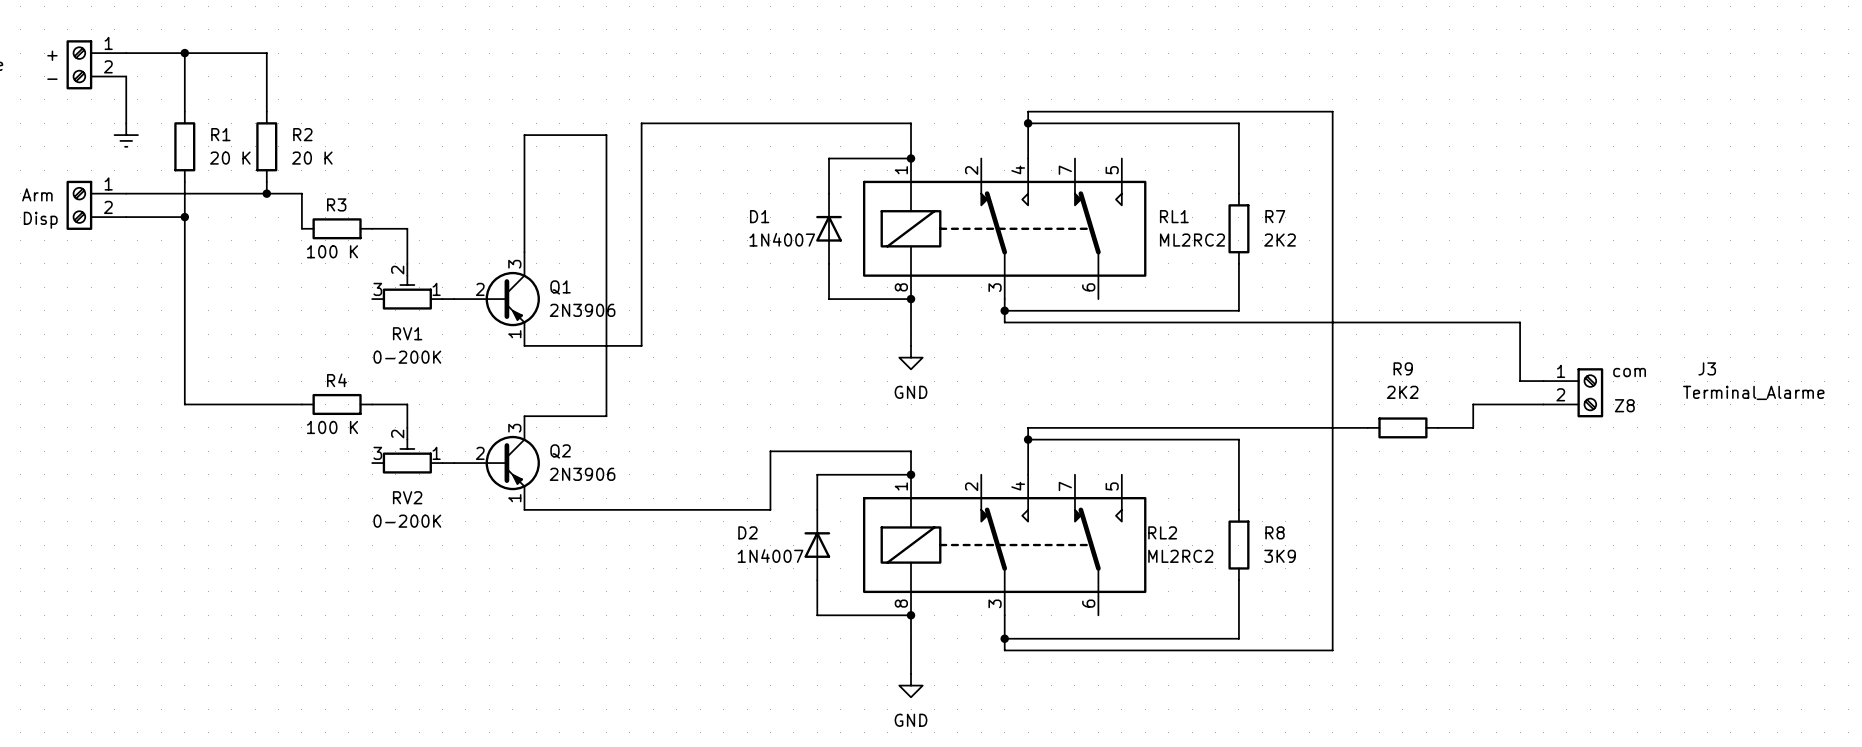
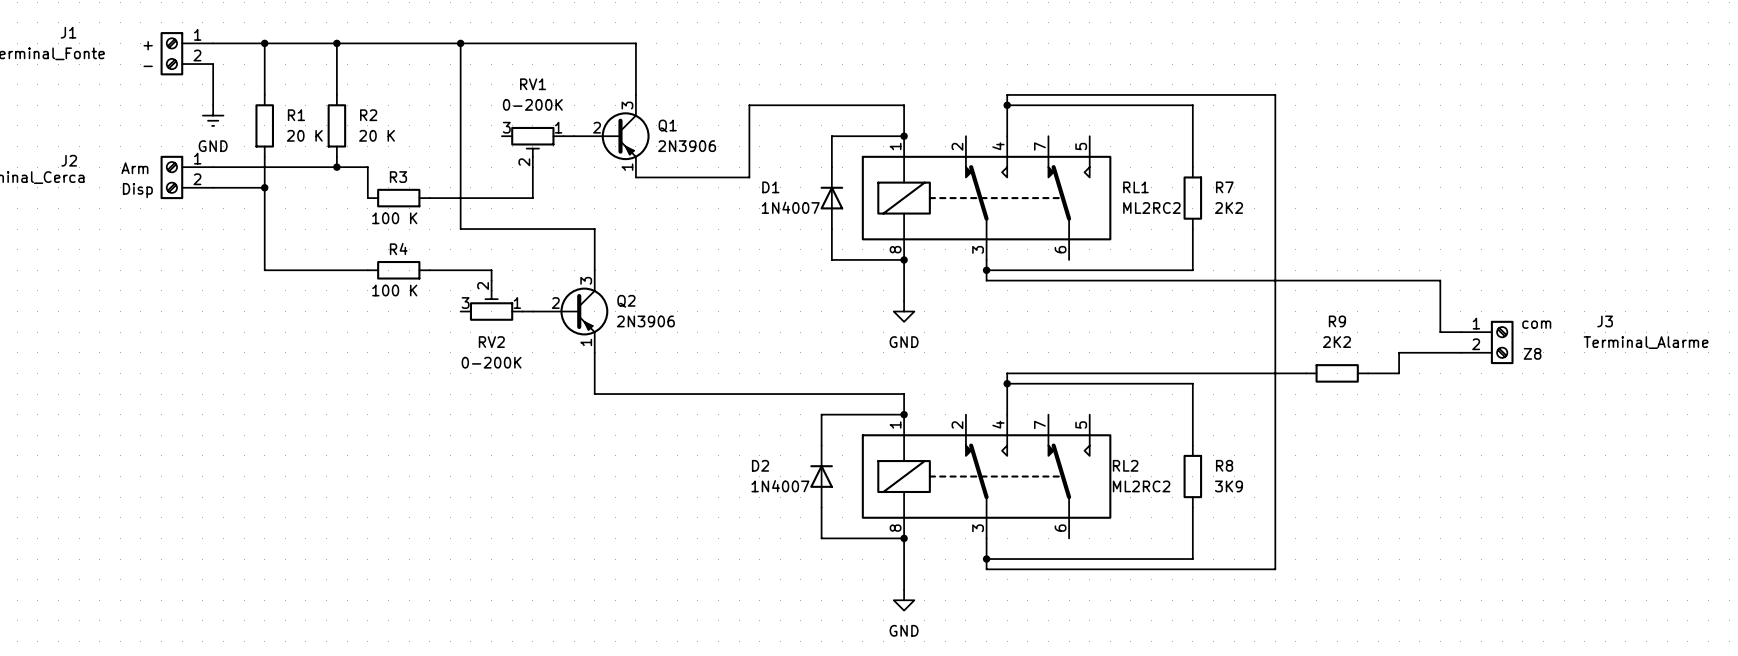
wire: none -> (336, 43) (635, 43) (635, 94)
junction: none -> (336, 43)
wire: none -> (460, 43) (460, 198) (532, 198) (532, 167)
junction: none -> (460, 43)
wire: (735, 123) (641, 123) (641, 345) (524, 345) -> (749, 105) (749, 177) (635, 177)
wire: none -> (563, 136) (574, 136)
power symbol text: none -> GND (213, 146)
wire: (524, 252) (524, 135) (606, 135) (606, 416) (524, 416) -> none
wire: none -> (460, 229) (594, 229) (594, 270)
RV1 position: (407, 286) -> (532, 147)
RV1 flip: as is (407, 292) -> up-down (532, 141)
wire: (442, 299) (454, 299) -> (522, 311) (532, 311)
Q1 position: (497, 299) -> (611, 136)
wire: (184, 310) (184, 404) (301, 404) -> (264, 270) (367, 270)
wire: none -> (429, 270) (491, 270) (491, 280)
RV1 name position: RV1 (407, 333) -> RV1 (533, 84)
RV1 value position: 0-200K (407, 357) -> 0-200K (532, 104)
R4 position: (337, 404) -> (398, 270)
wire: (372, 404) (407, 404) (407, 427) -> none
RV2 position: (407, 450) -> (491, 300)
wire: (770, 451) (770, 509) (524, 509) -> (780, 394) (594, 394) (594, 352)
wire: (442, 463) (454, 463) -> none
Q2 position: (497, 463) -> (570, 311)

